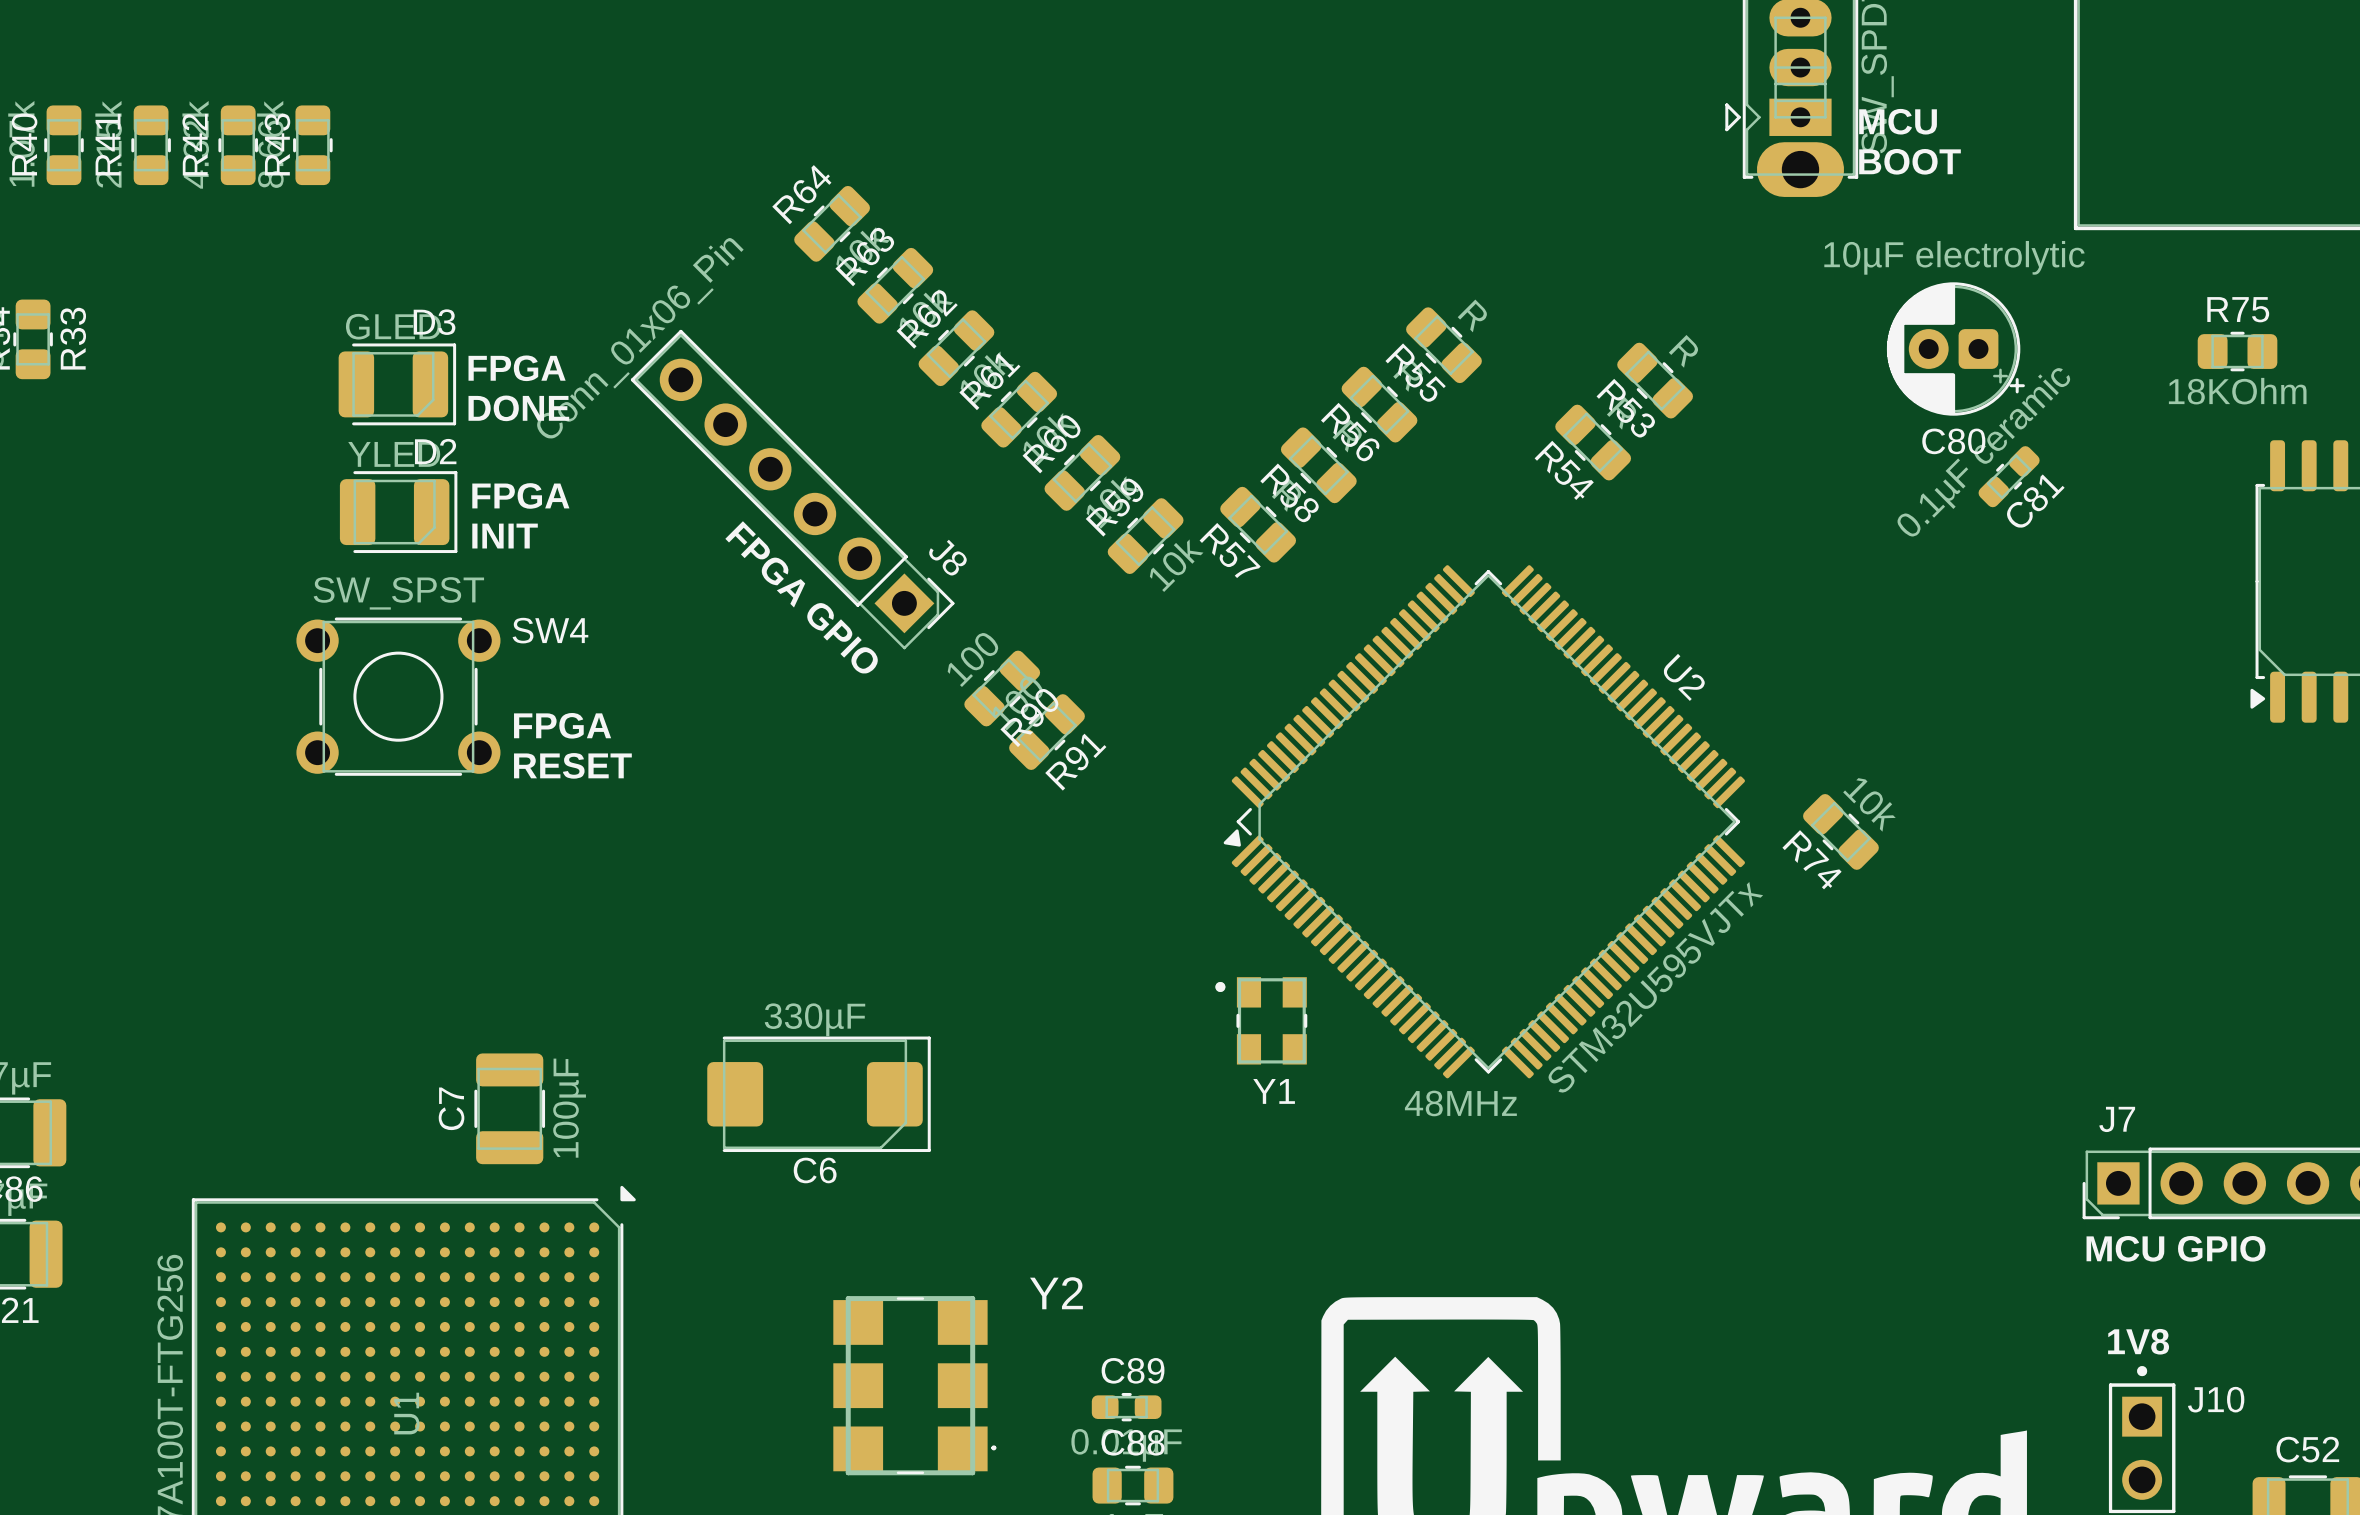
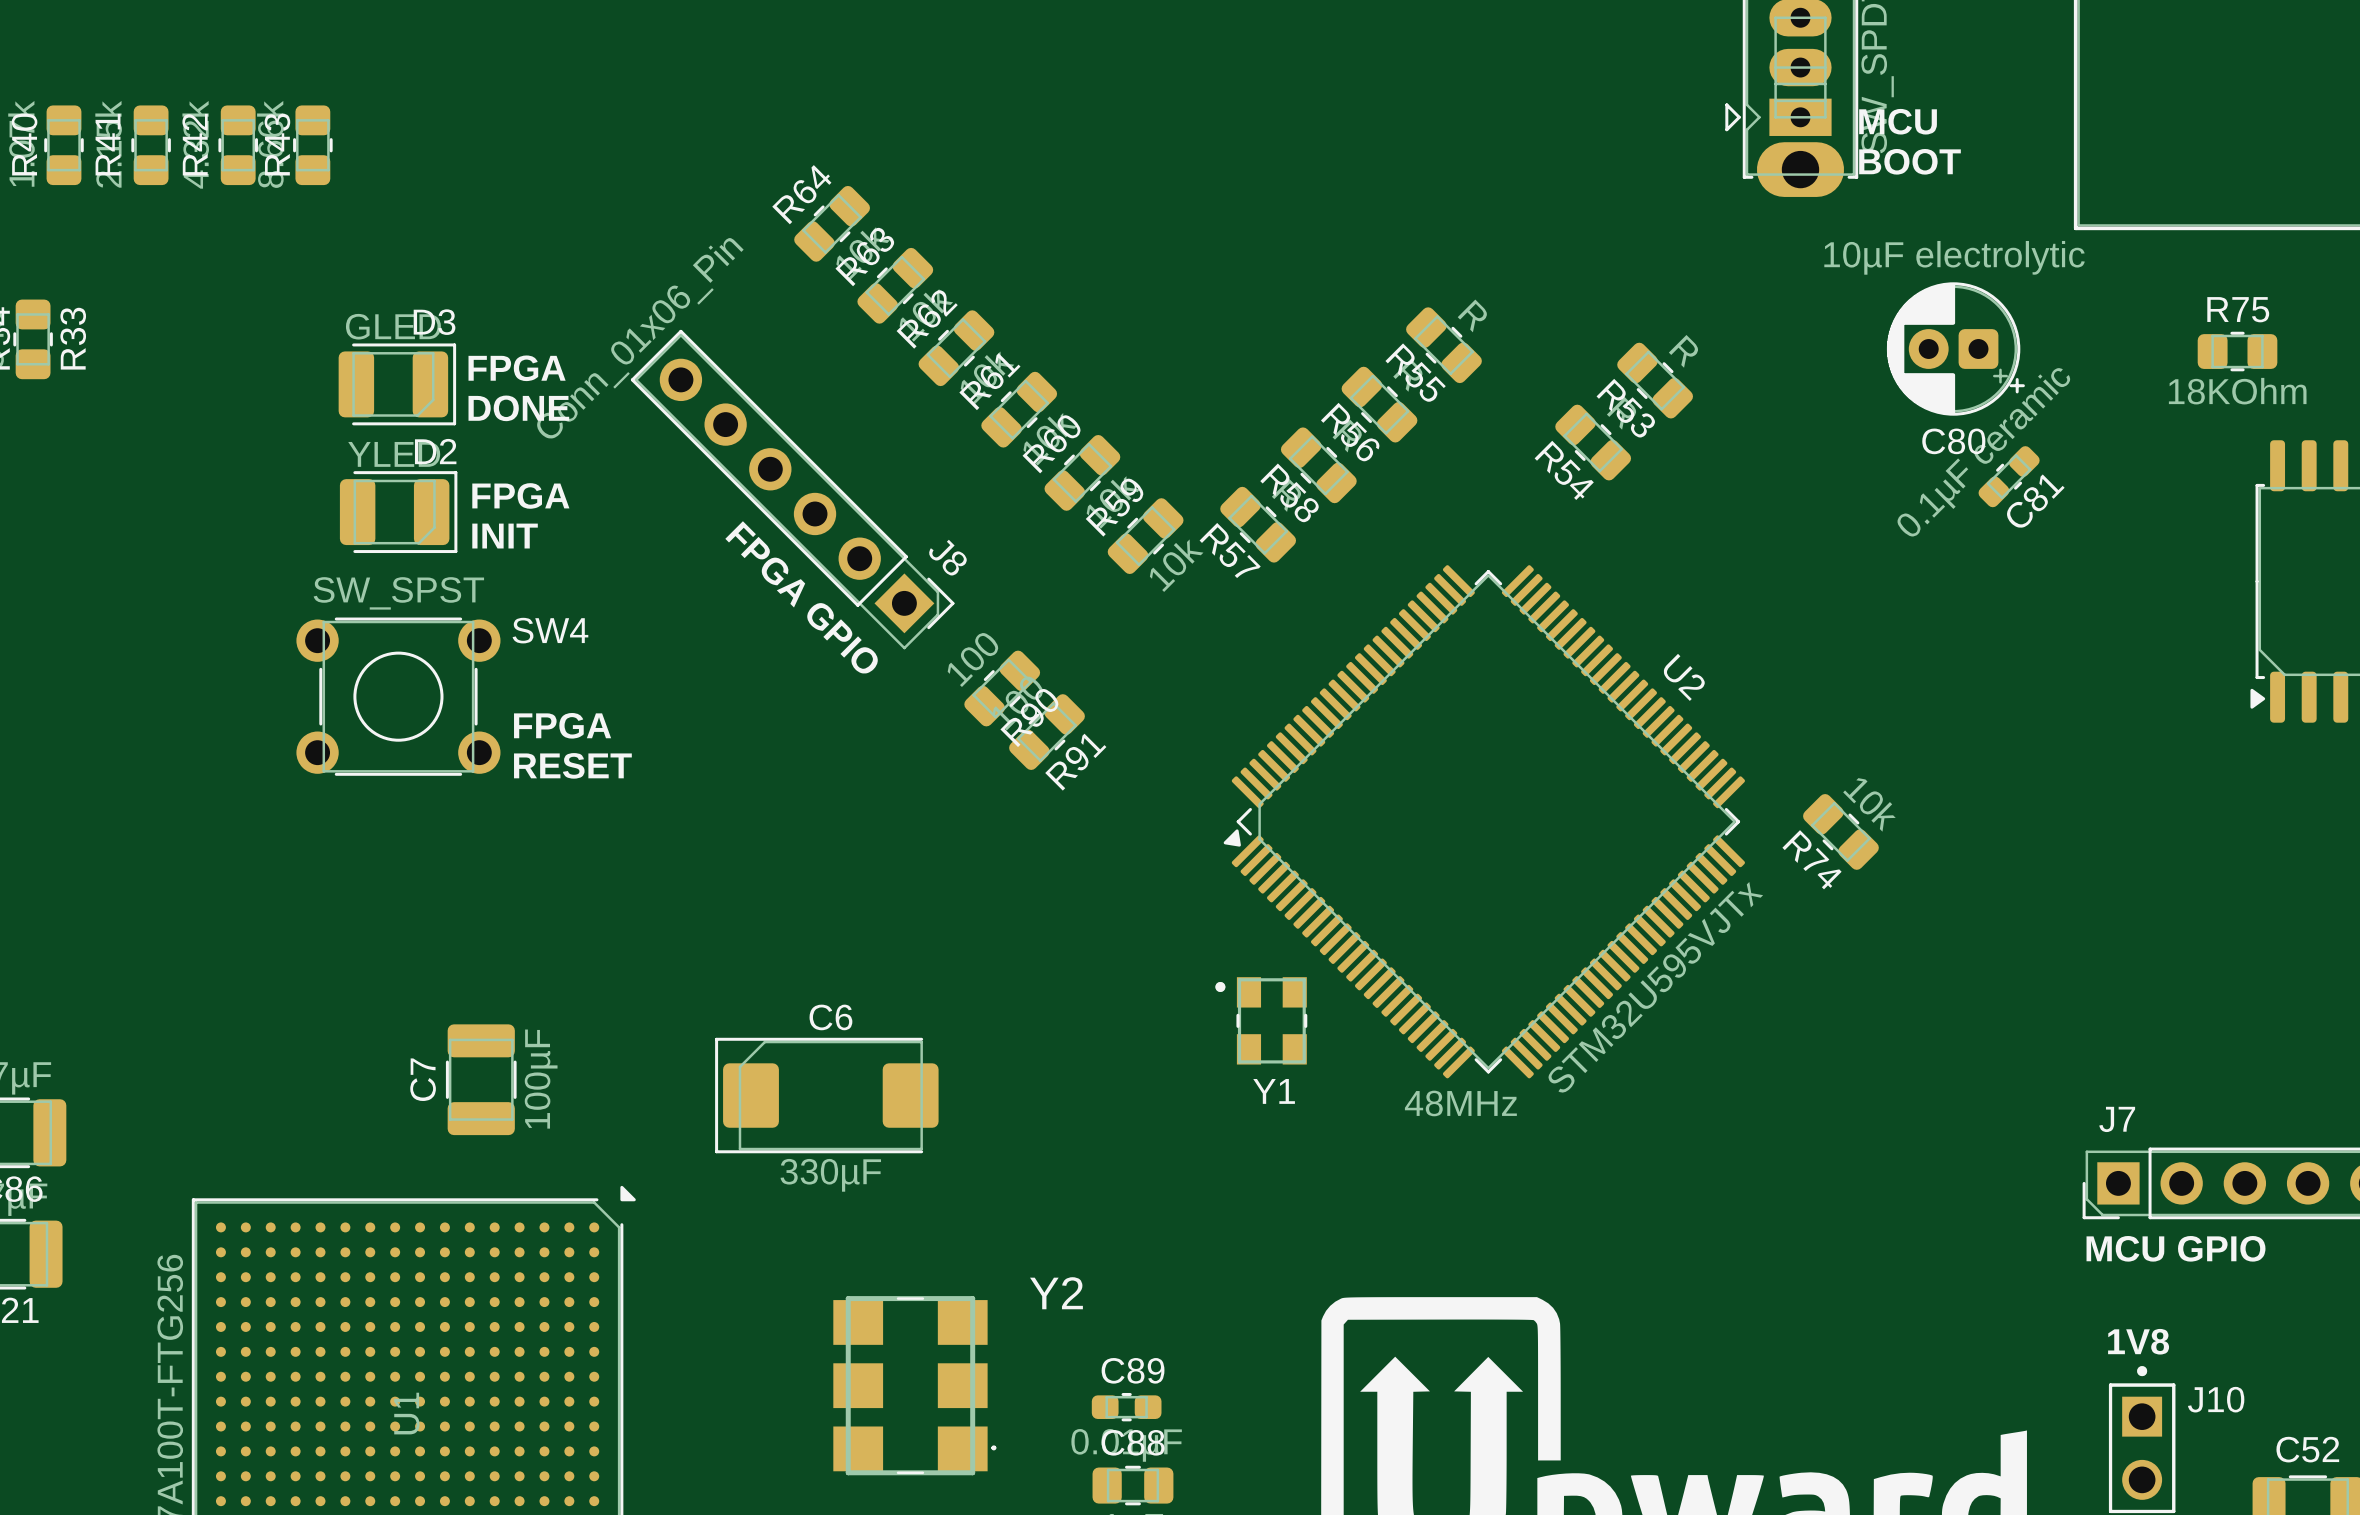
C6 rotation: 0° (819, 1094) -> 180° (826, 1095)
C7 position: (509, 1108) -> (481, 1079)

